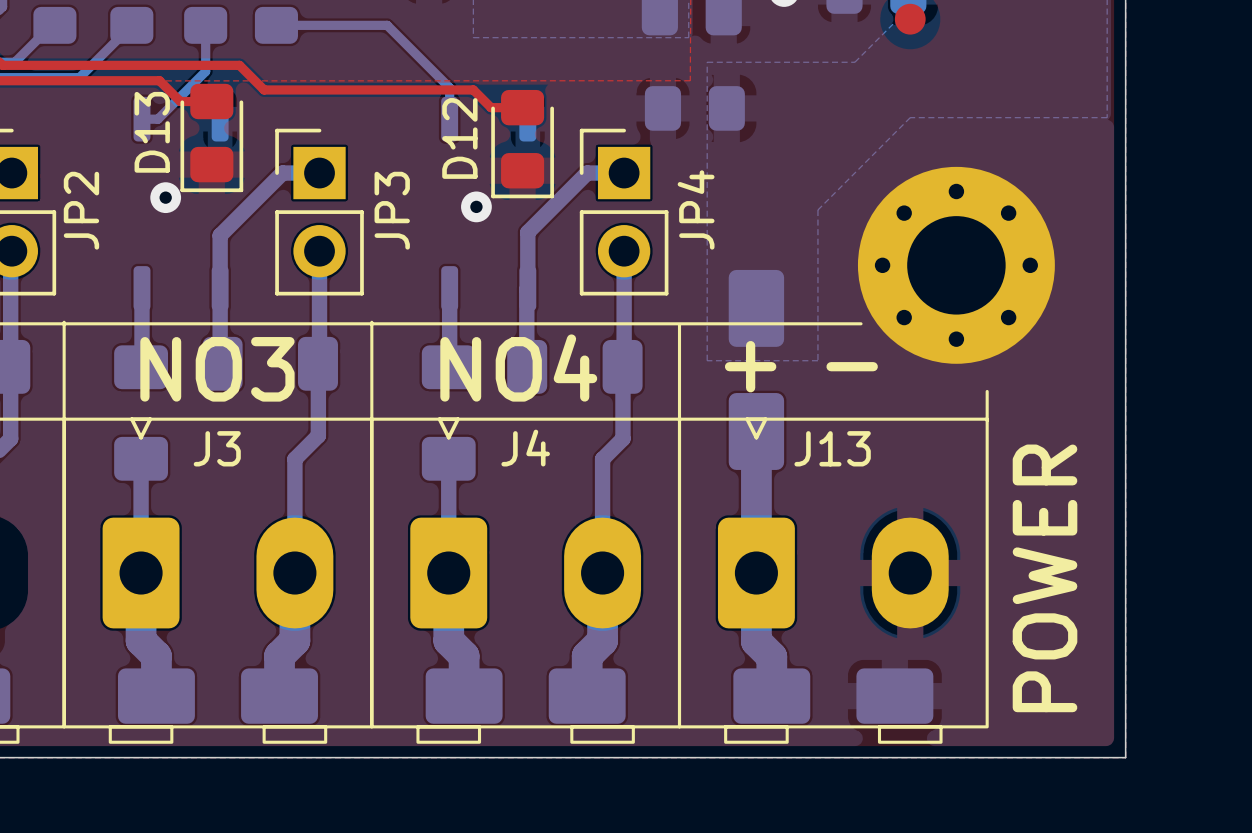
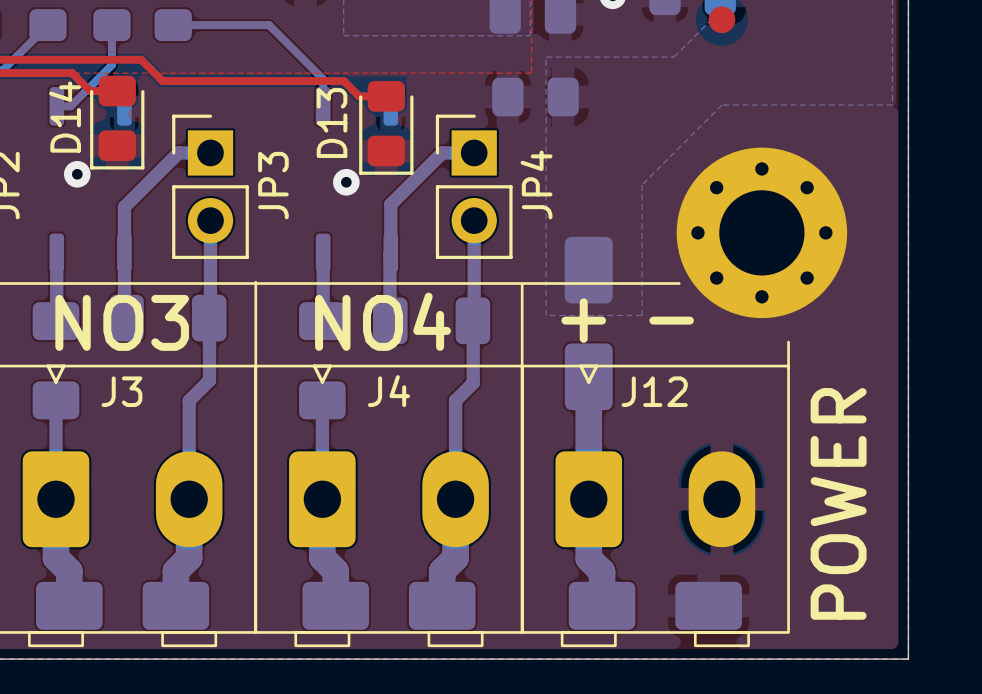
D13 name: D13 (152, 132) -> D14 (65, 117)
D12 name: D12 (459, 138) -> D13 (332, 123)
J13 name: J13 (832, 448) -> J12 (654, 391)

